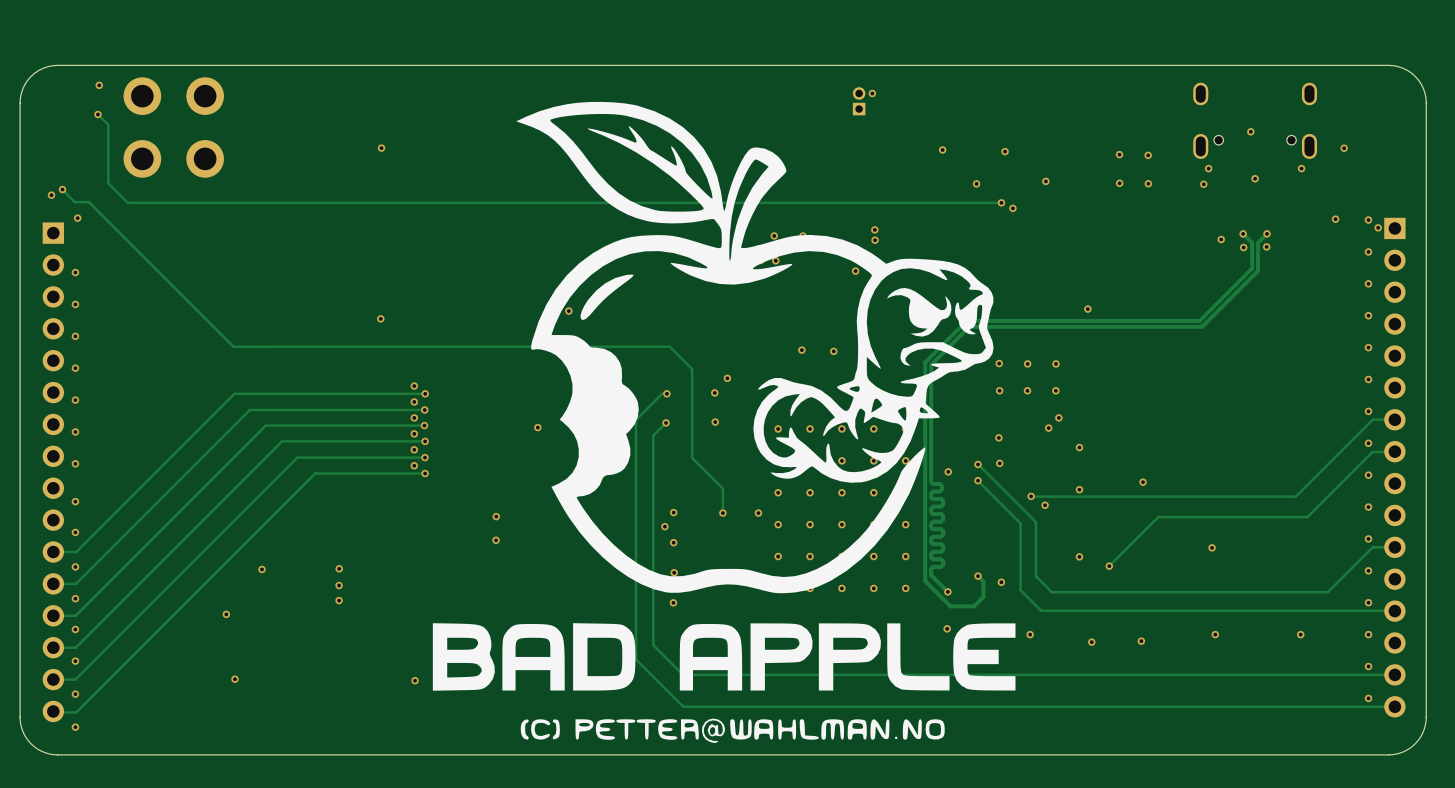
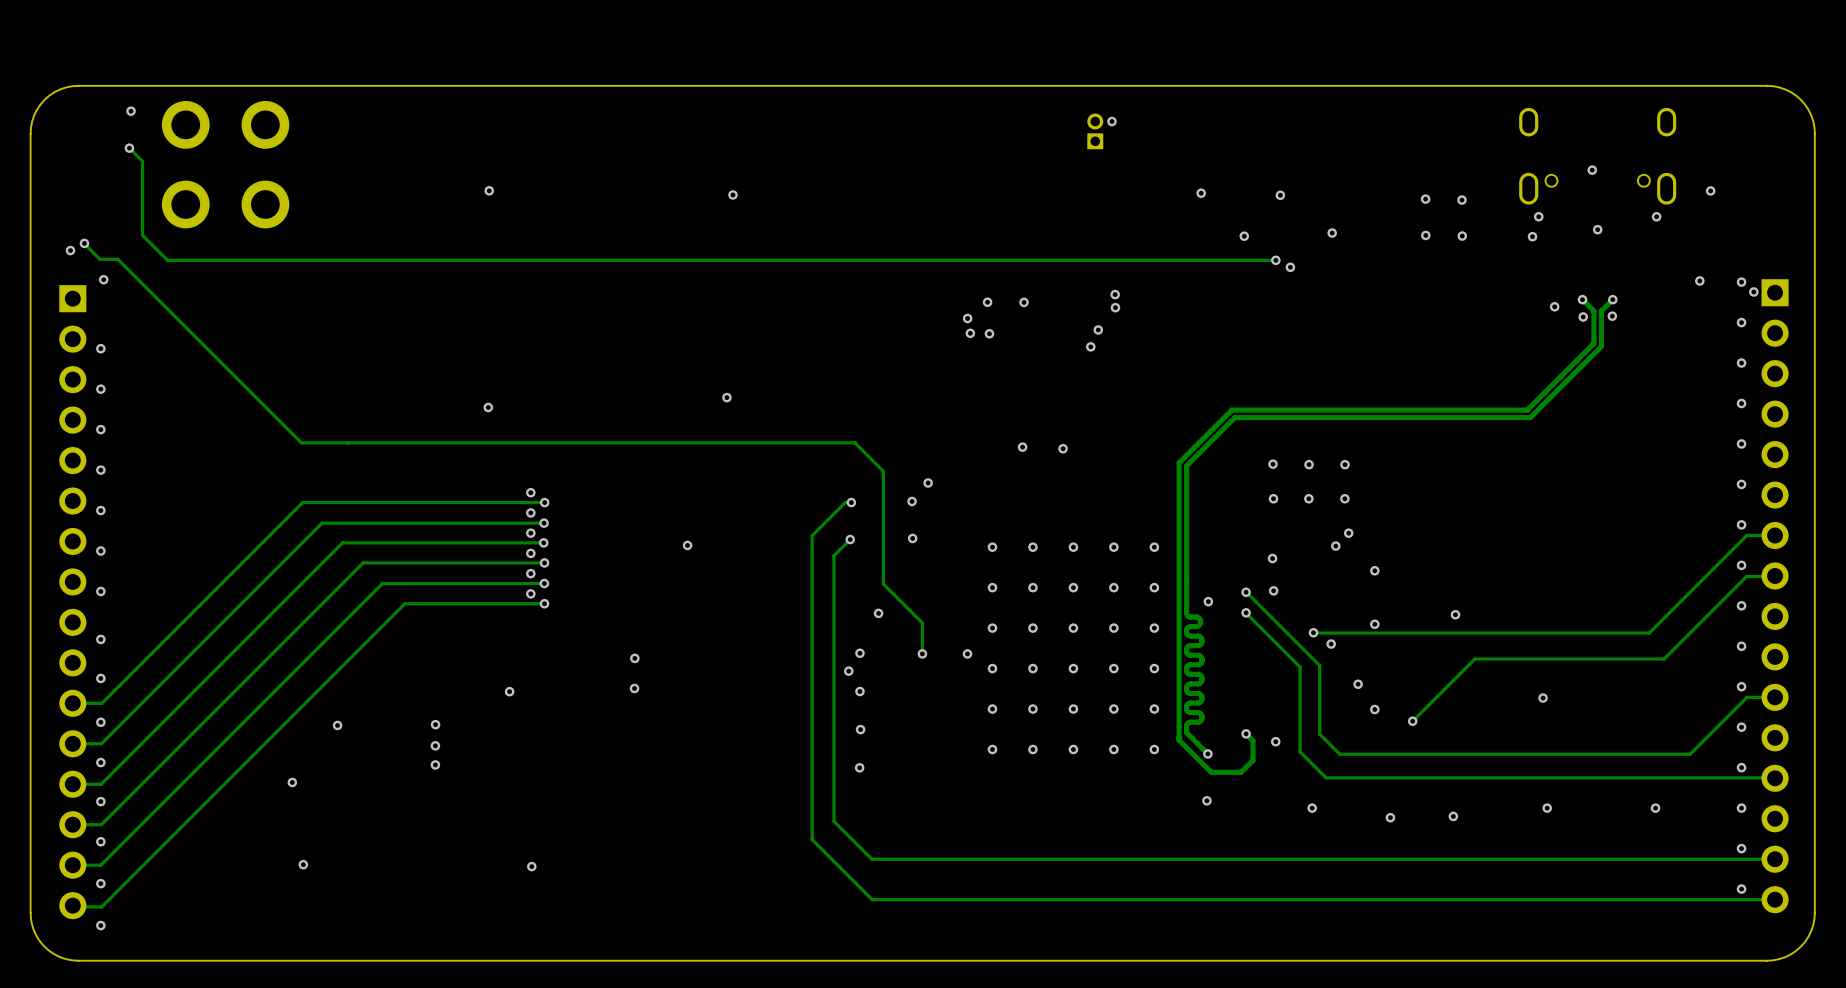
drawing: [432, 101, 1016, 743] -> none
via: (1087, 309) -> none
via: none -> (878, 613)
via: none -> (1358, 684)
via: none -> (509, 691)

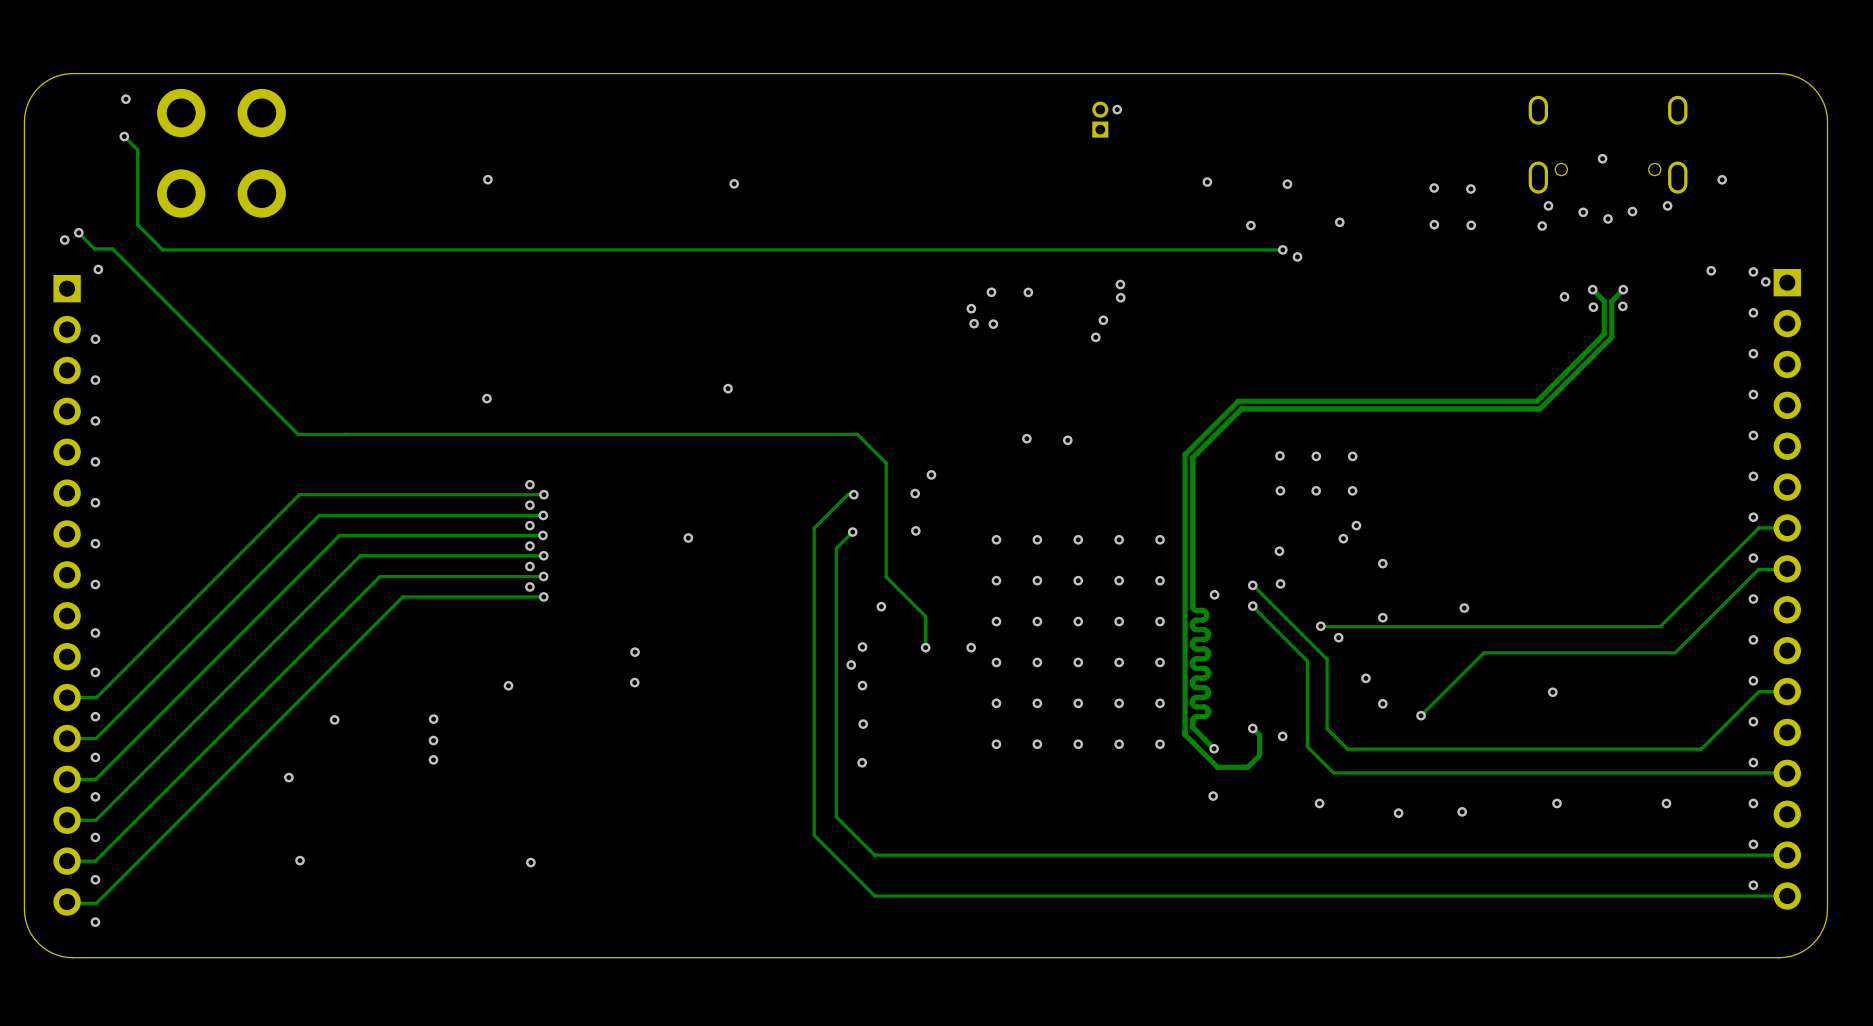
via: none -> (1632, 211)
via: none -> (1583, 212)

